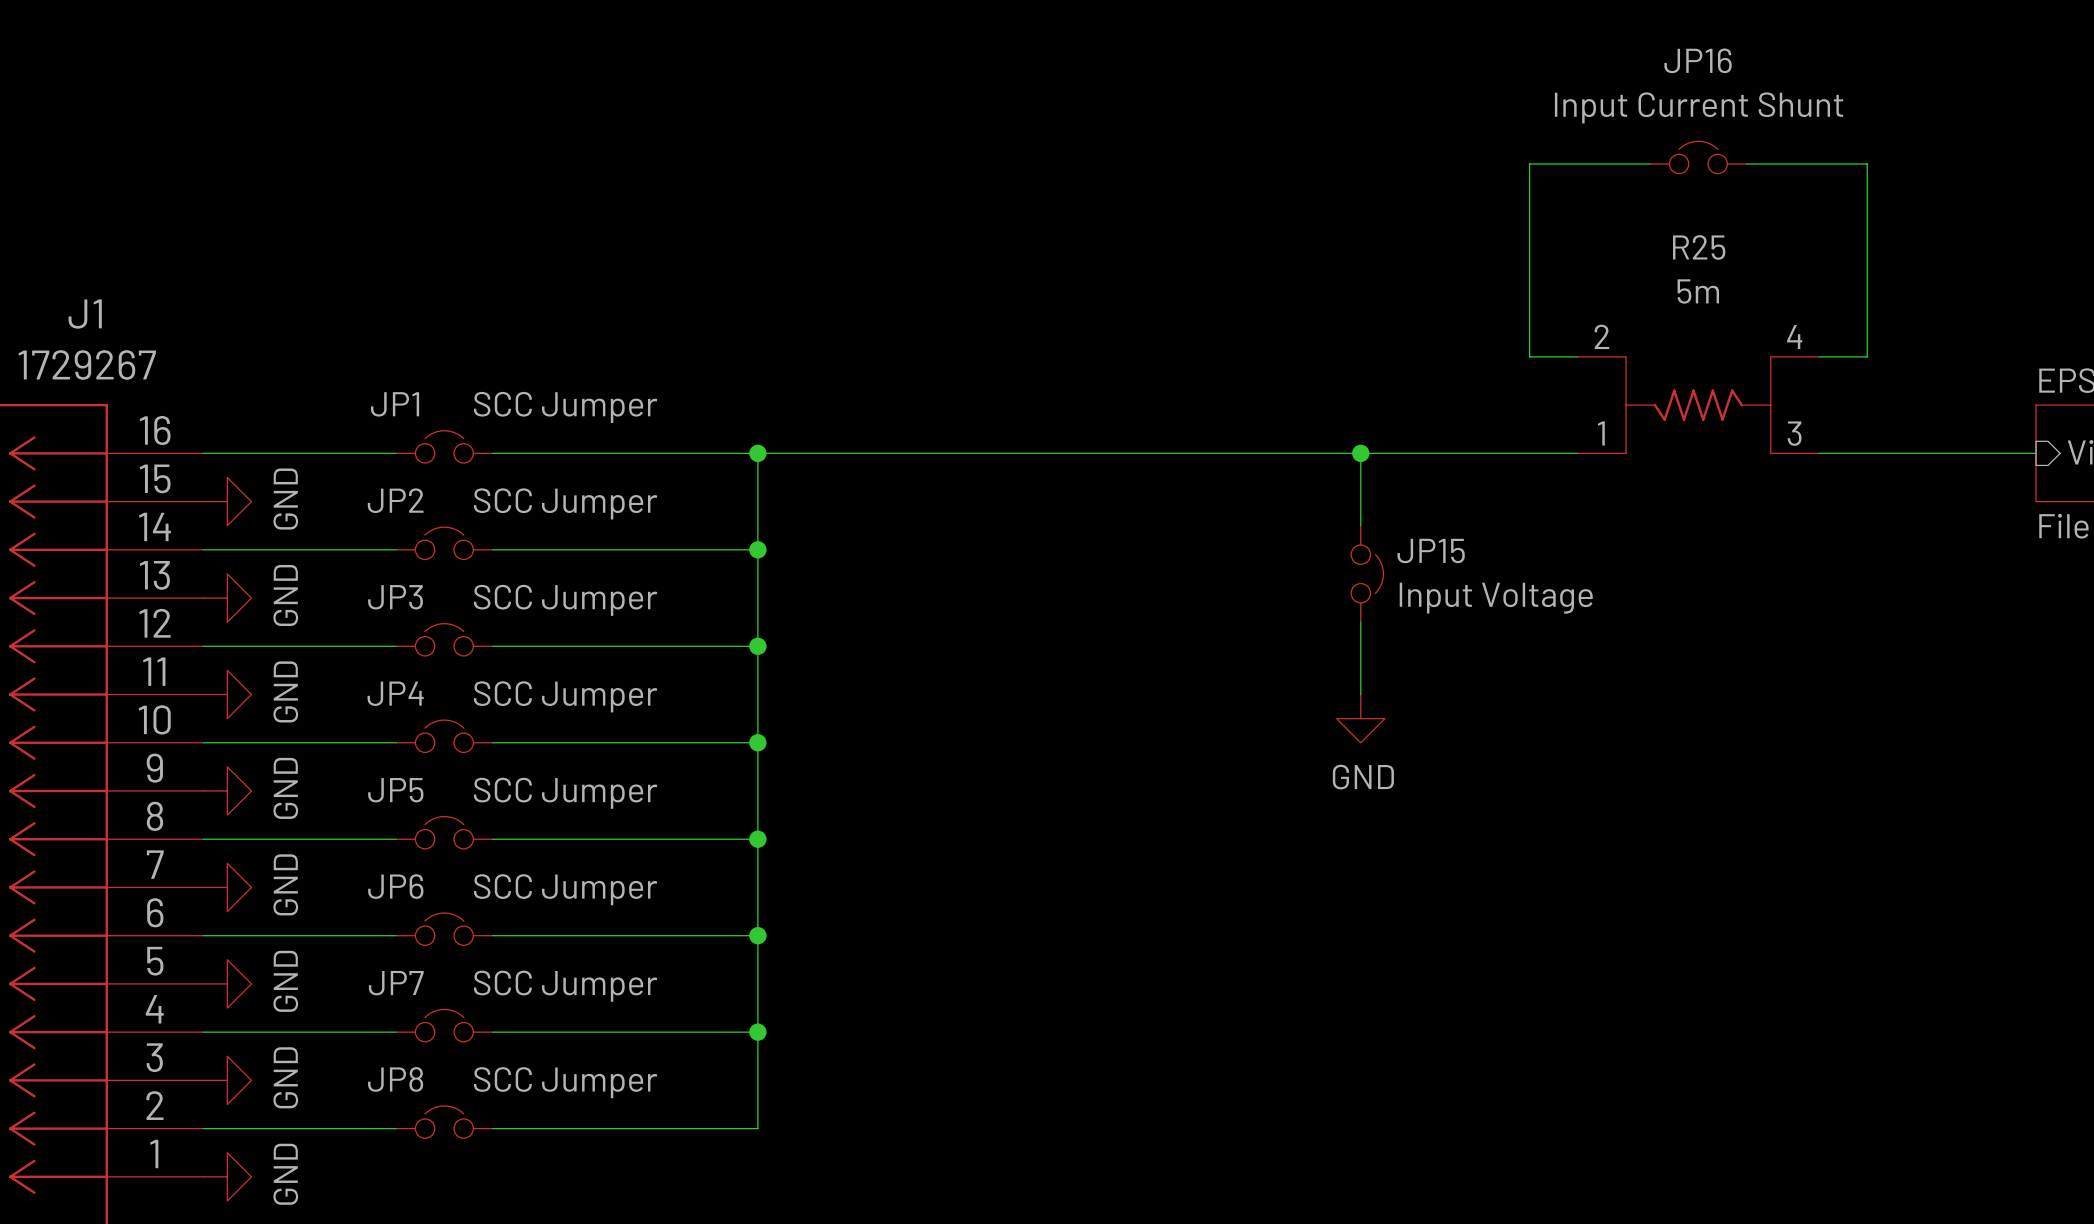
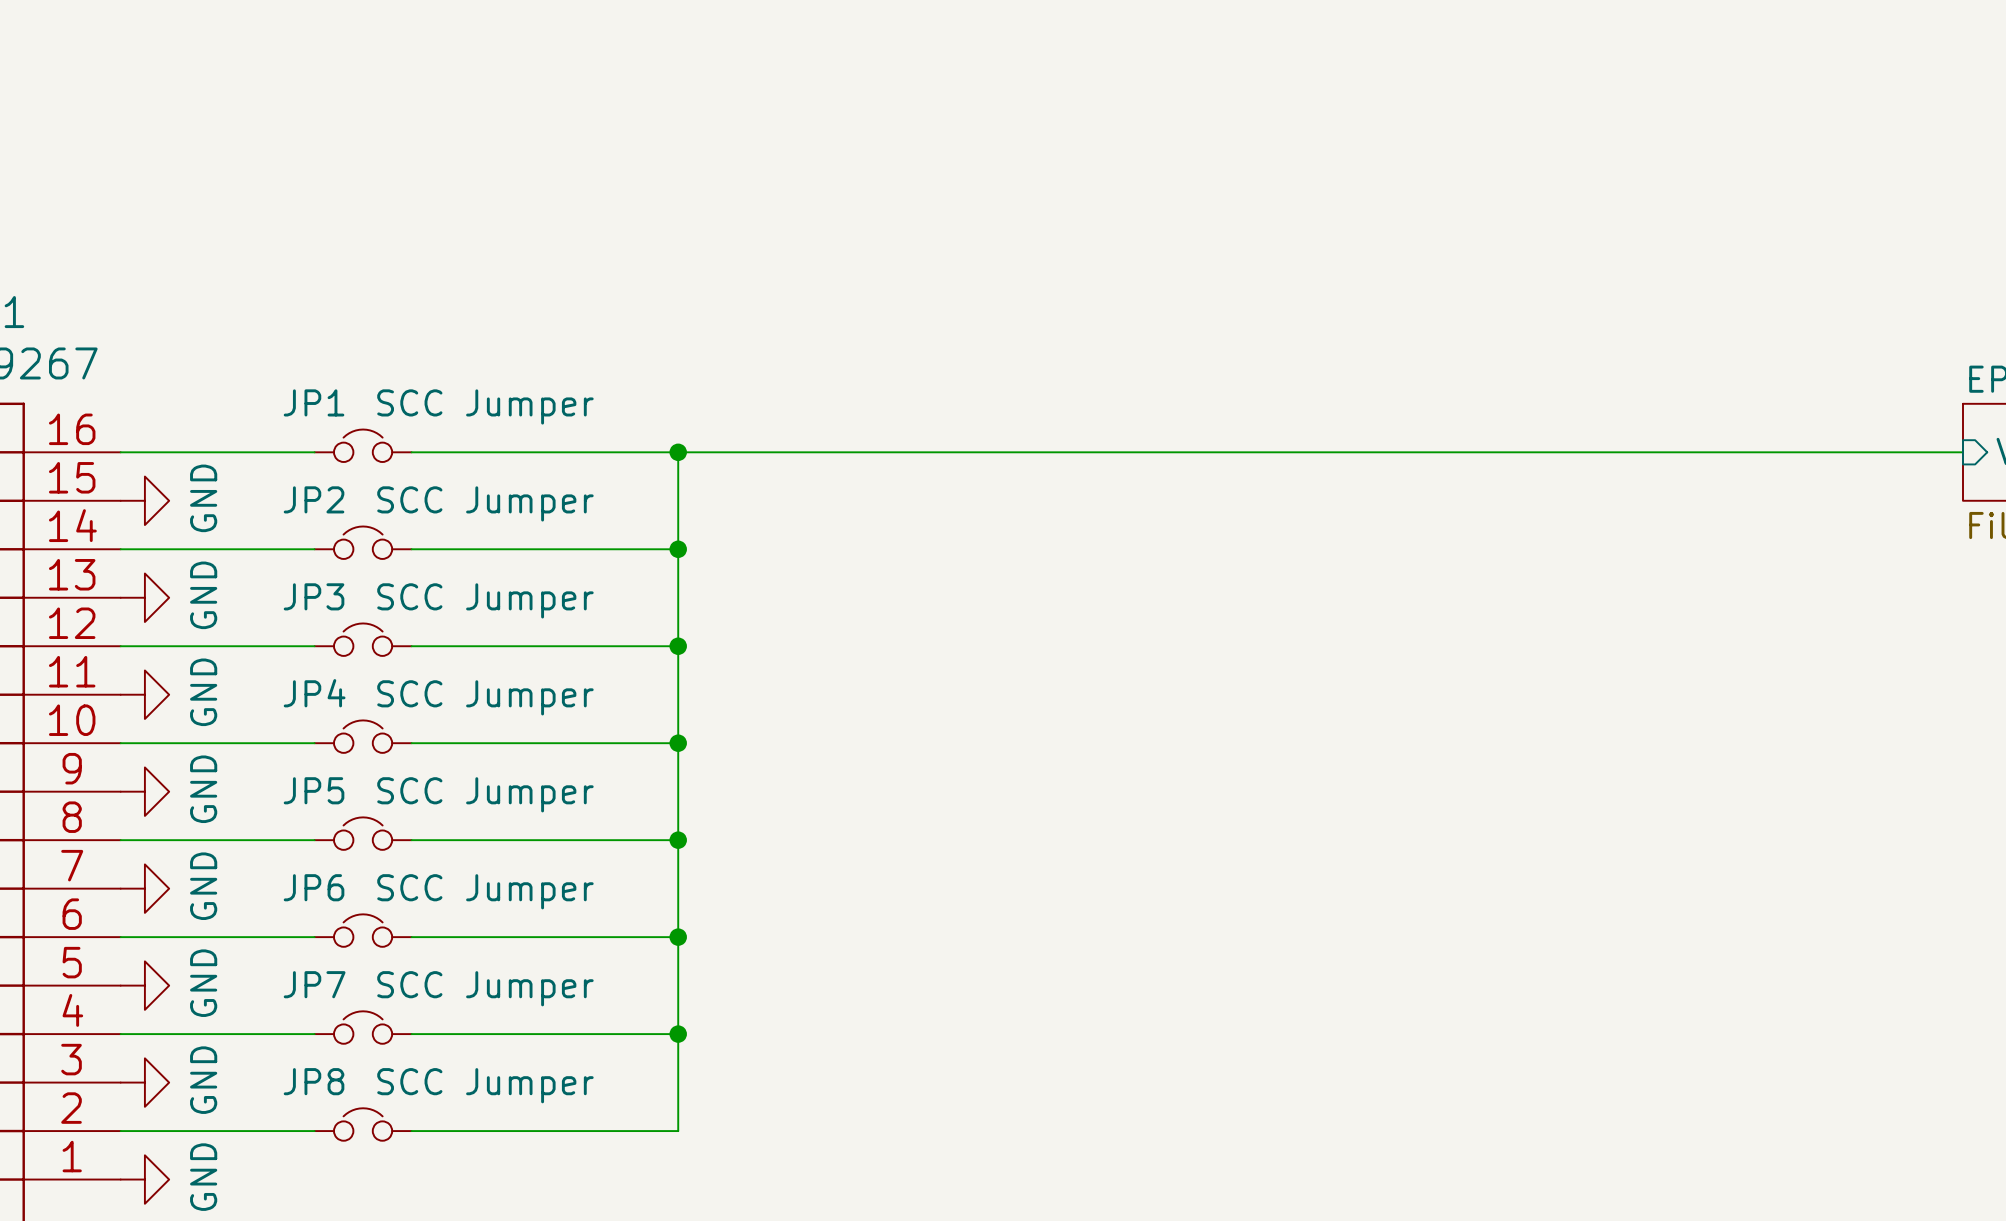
JP16: Input Current Shunt (1698, 157) -> none
wire: (1650, 163) (1529, 163) (1529, 356) (1577, 356) -> none
wire: (1746, 163) (1867, 163) (1867, 356) (1818, 356) -> none
R25: 5m (1698, 405) -> none
wire: (1360, 453) (1360, 525) -> none
junction: (1360, 453) -> none
wire: none -> (1502, 452) (1744, 452)
JP15: Input Voltage (1367, 573) -> none
wire: (1360, 622) (1360, 694) -> none
power symbol: GND (1360, 718) -> none

